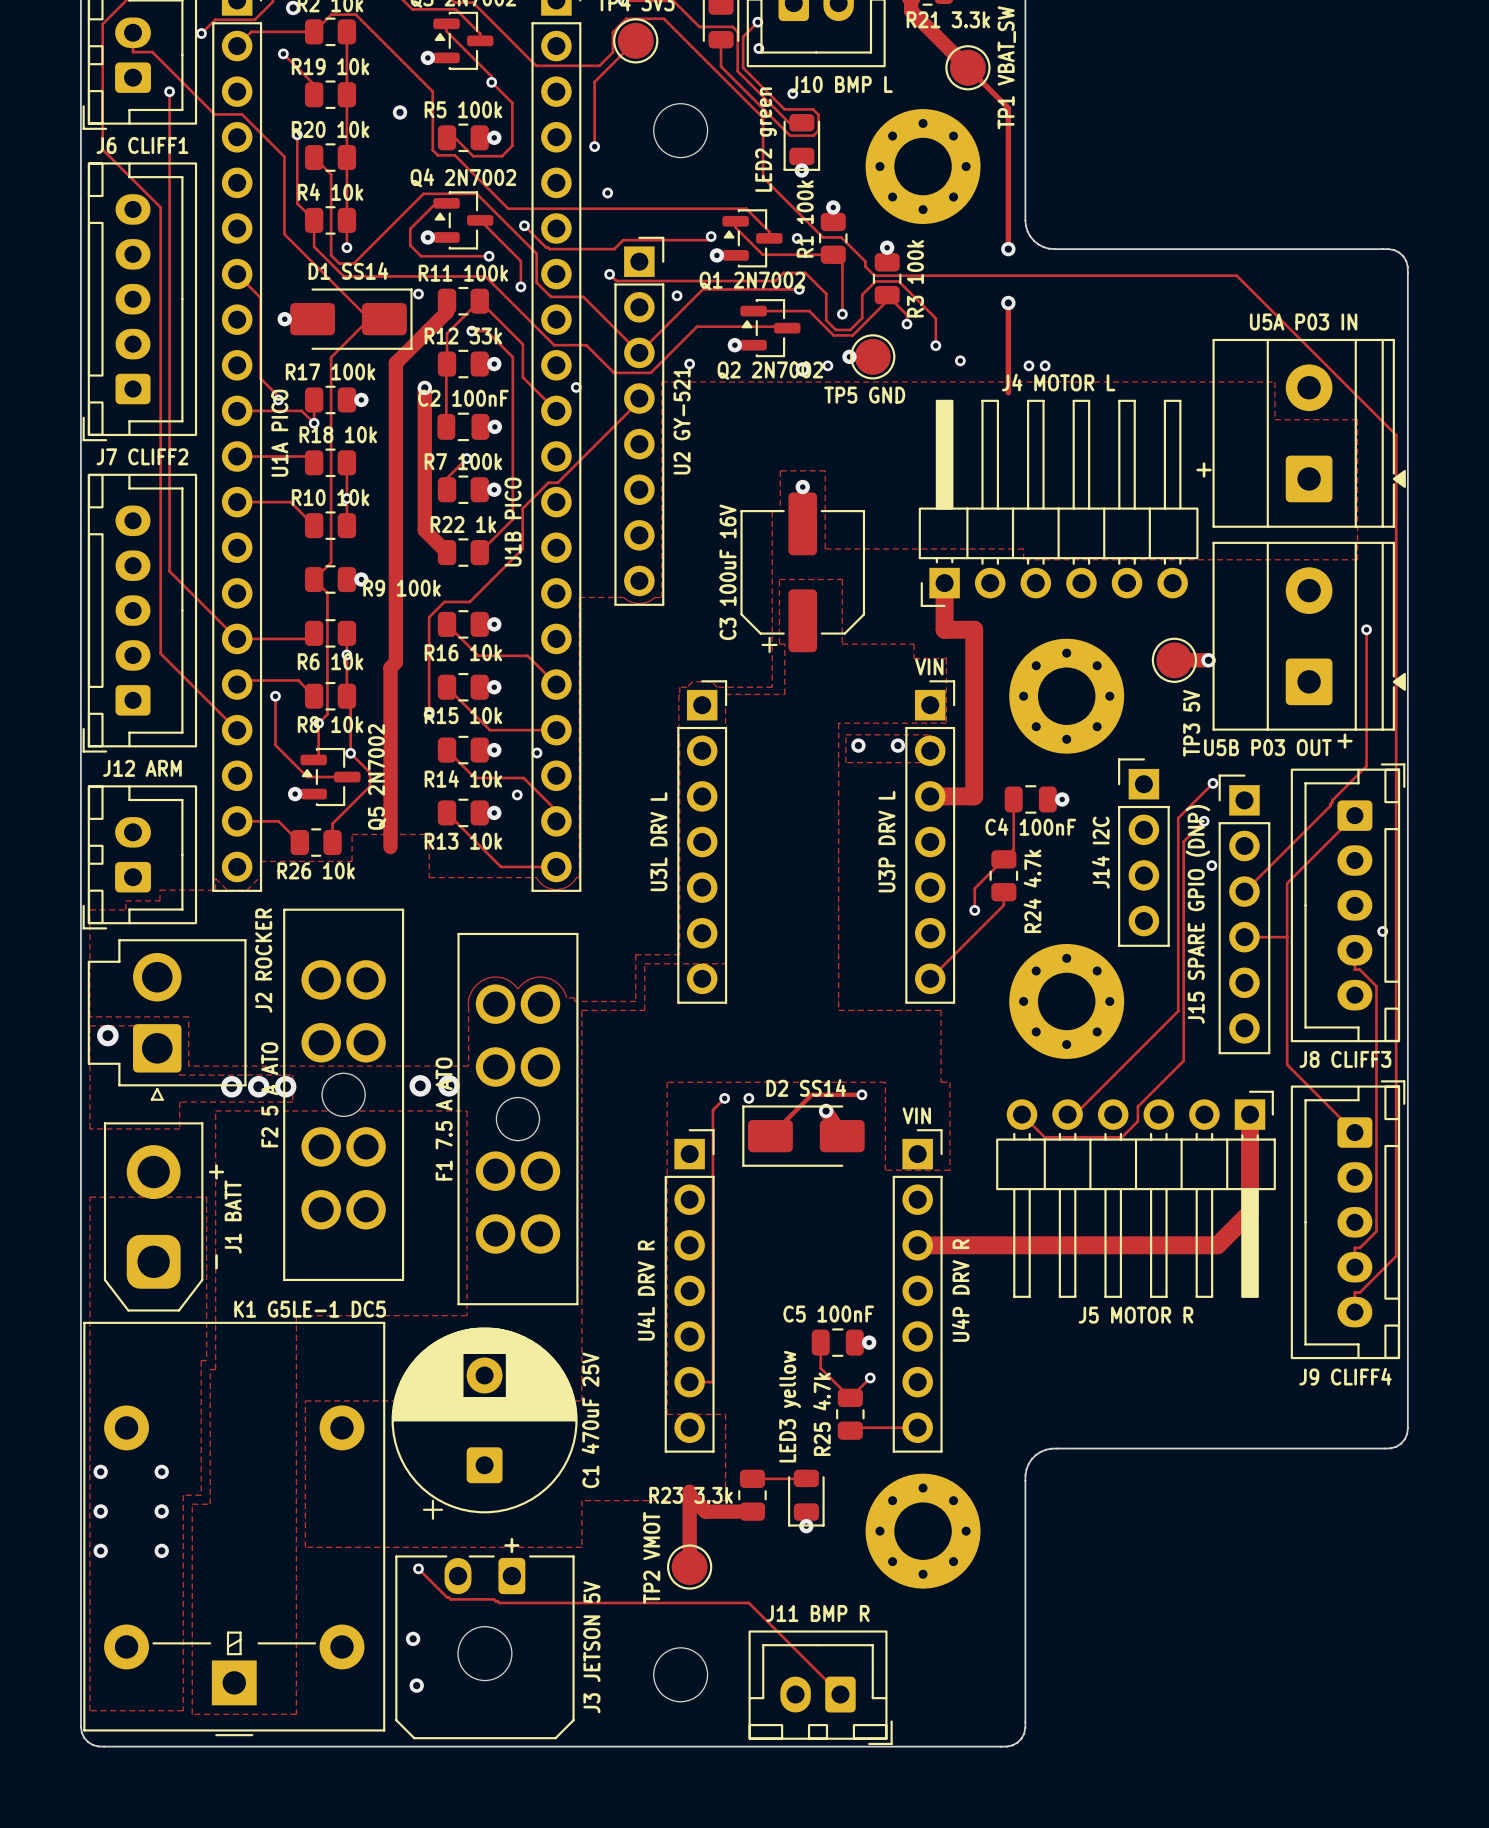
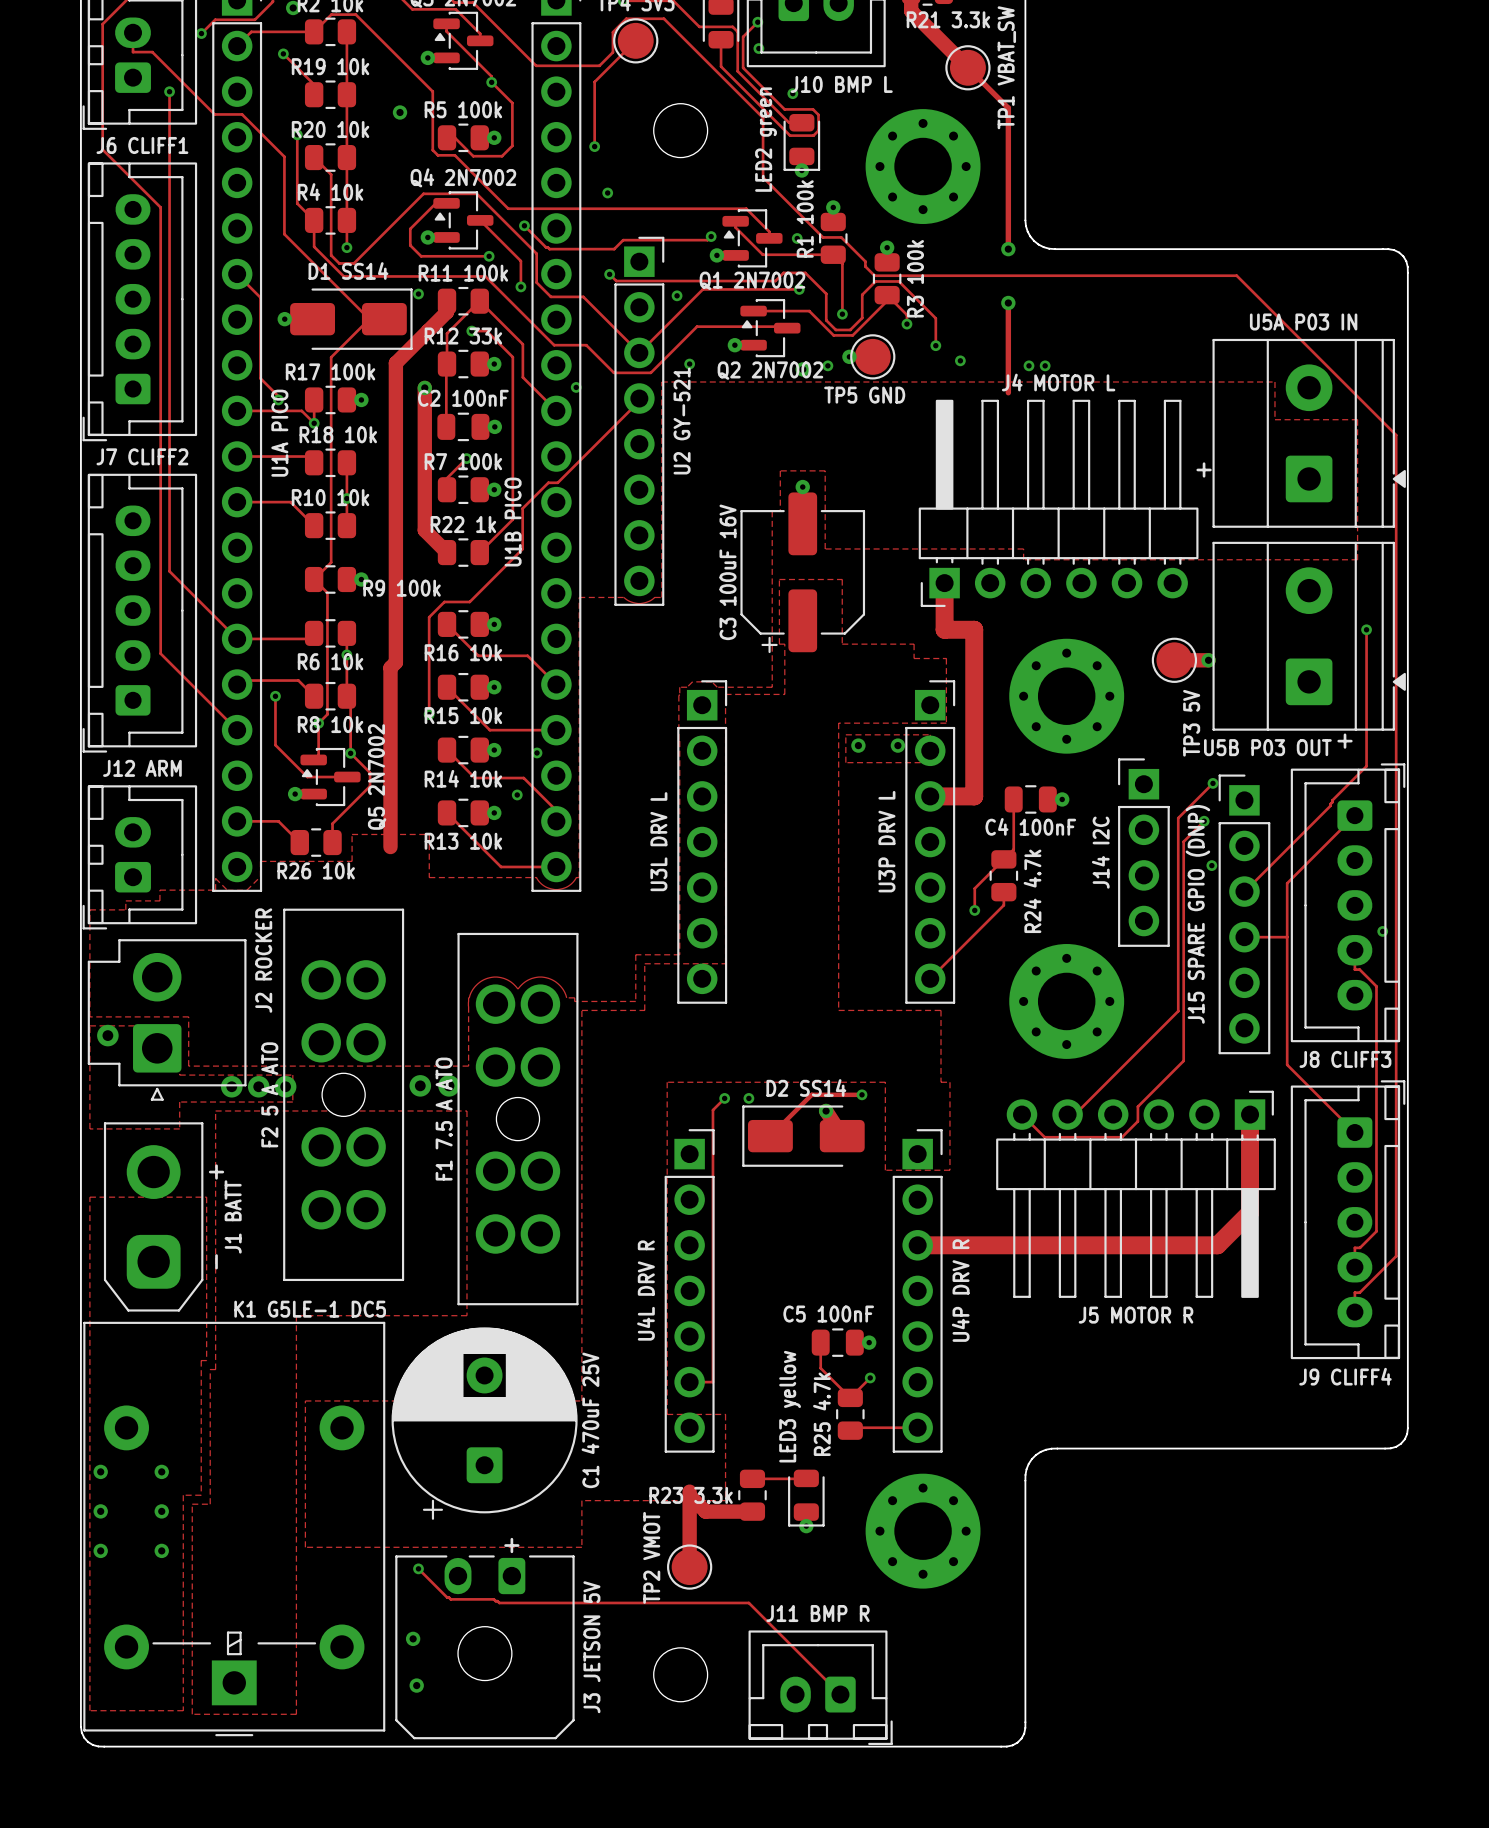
part text: VIN (929, 666) -> none
part text: VIN (916, 1115) -> none

